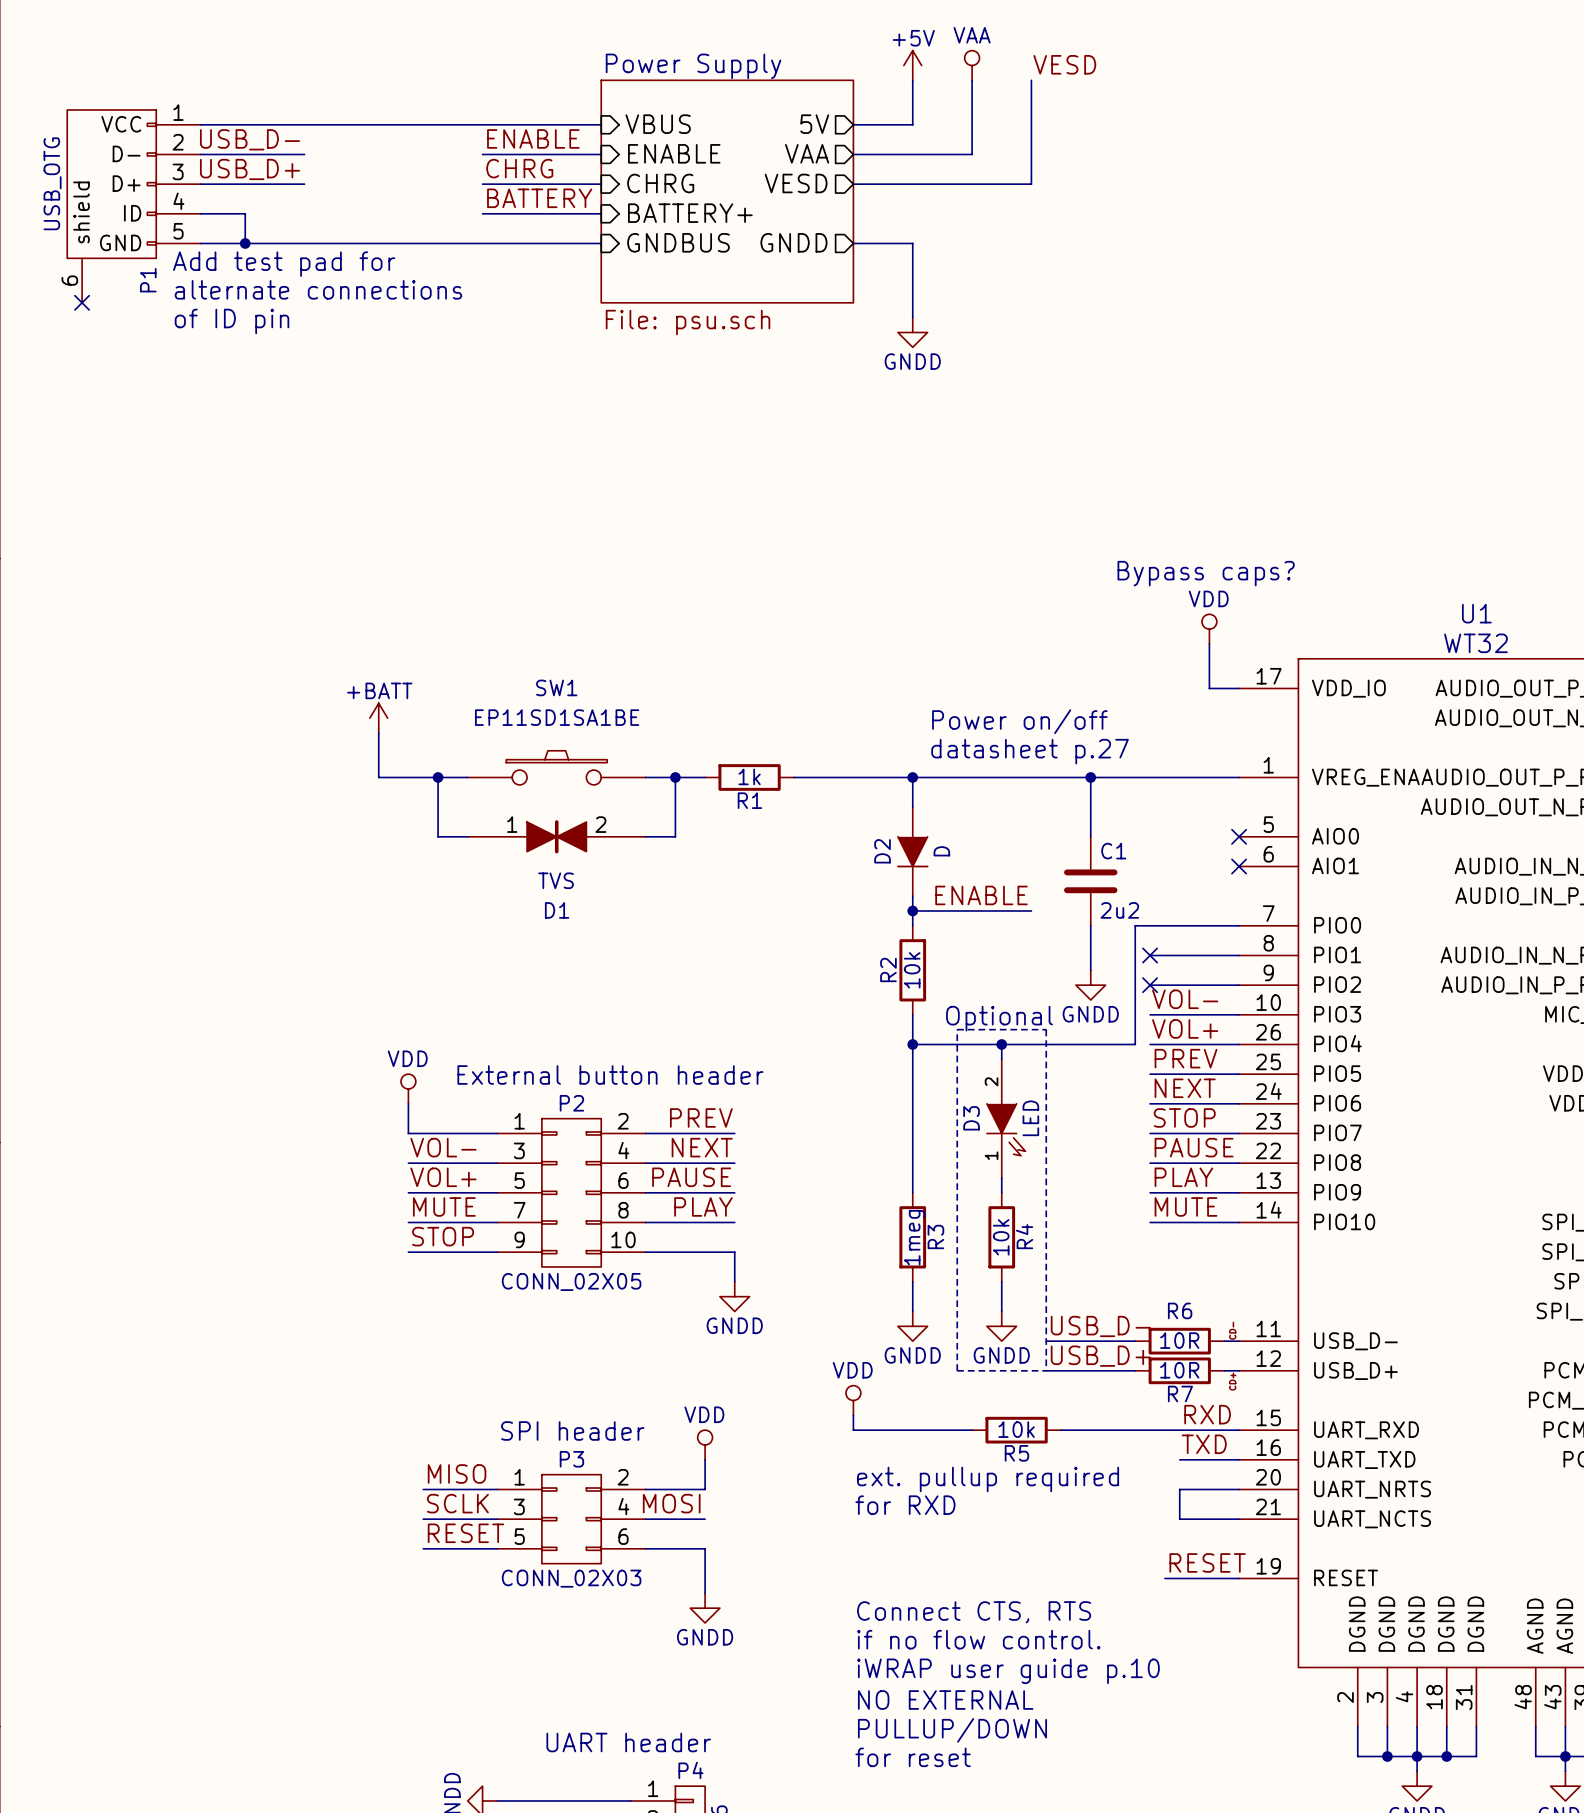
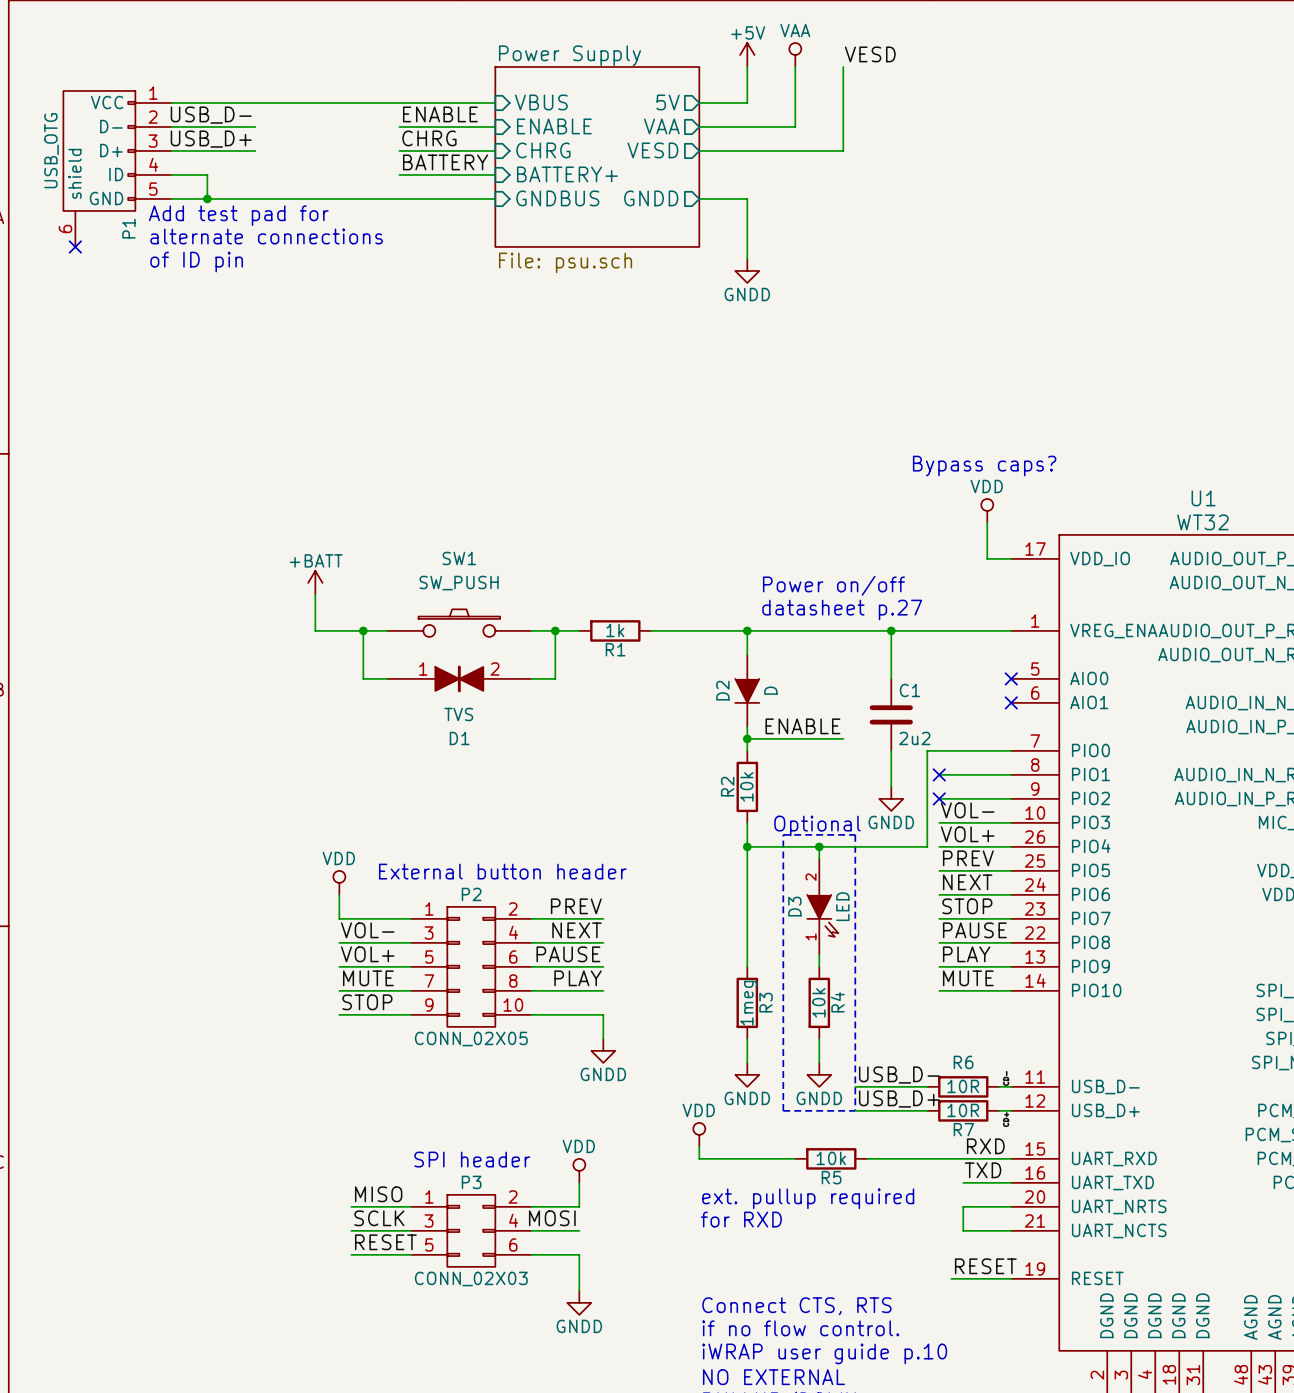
SW1 value: EP11SD1SA1BE (557, 717) -> SW_PUSH (459, 583)

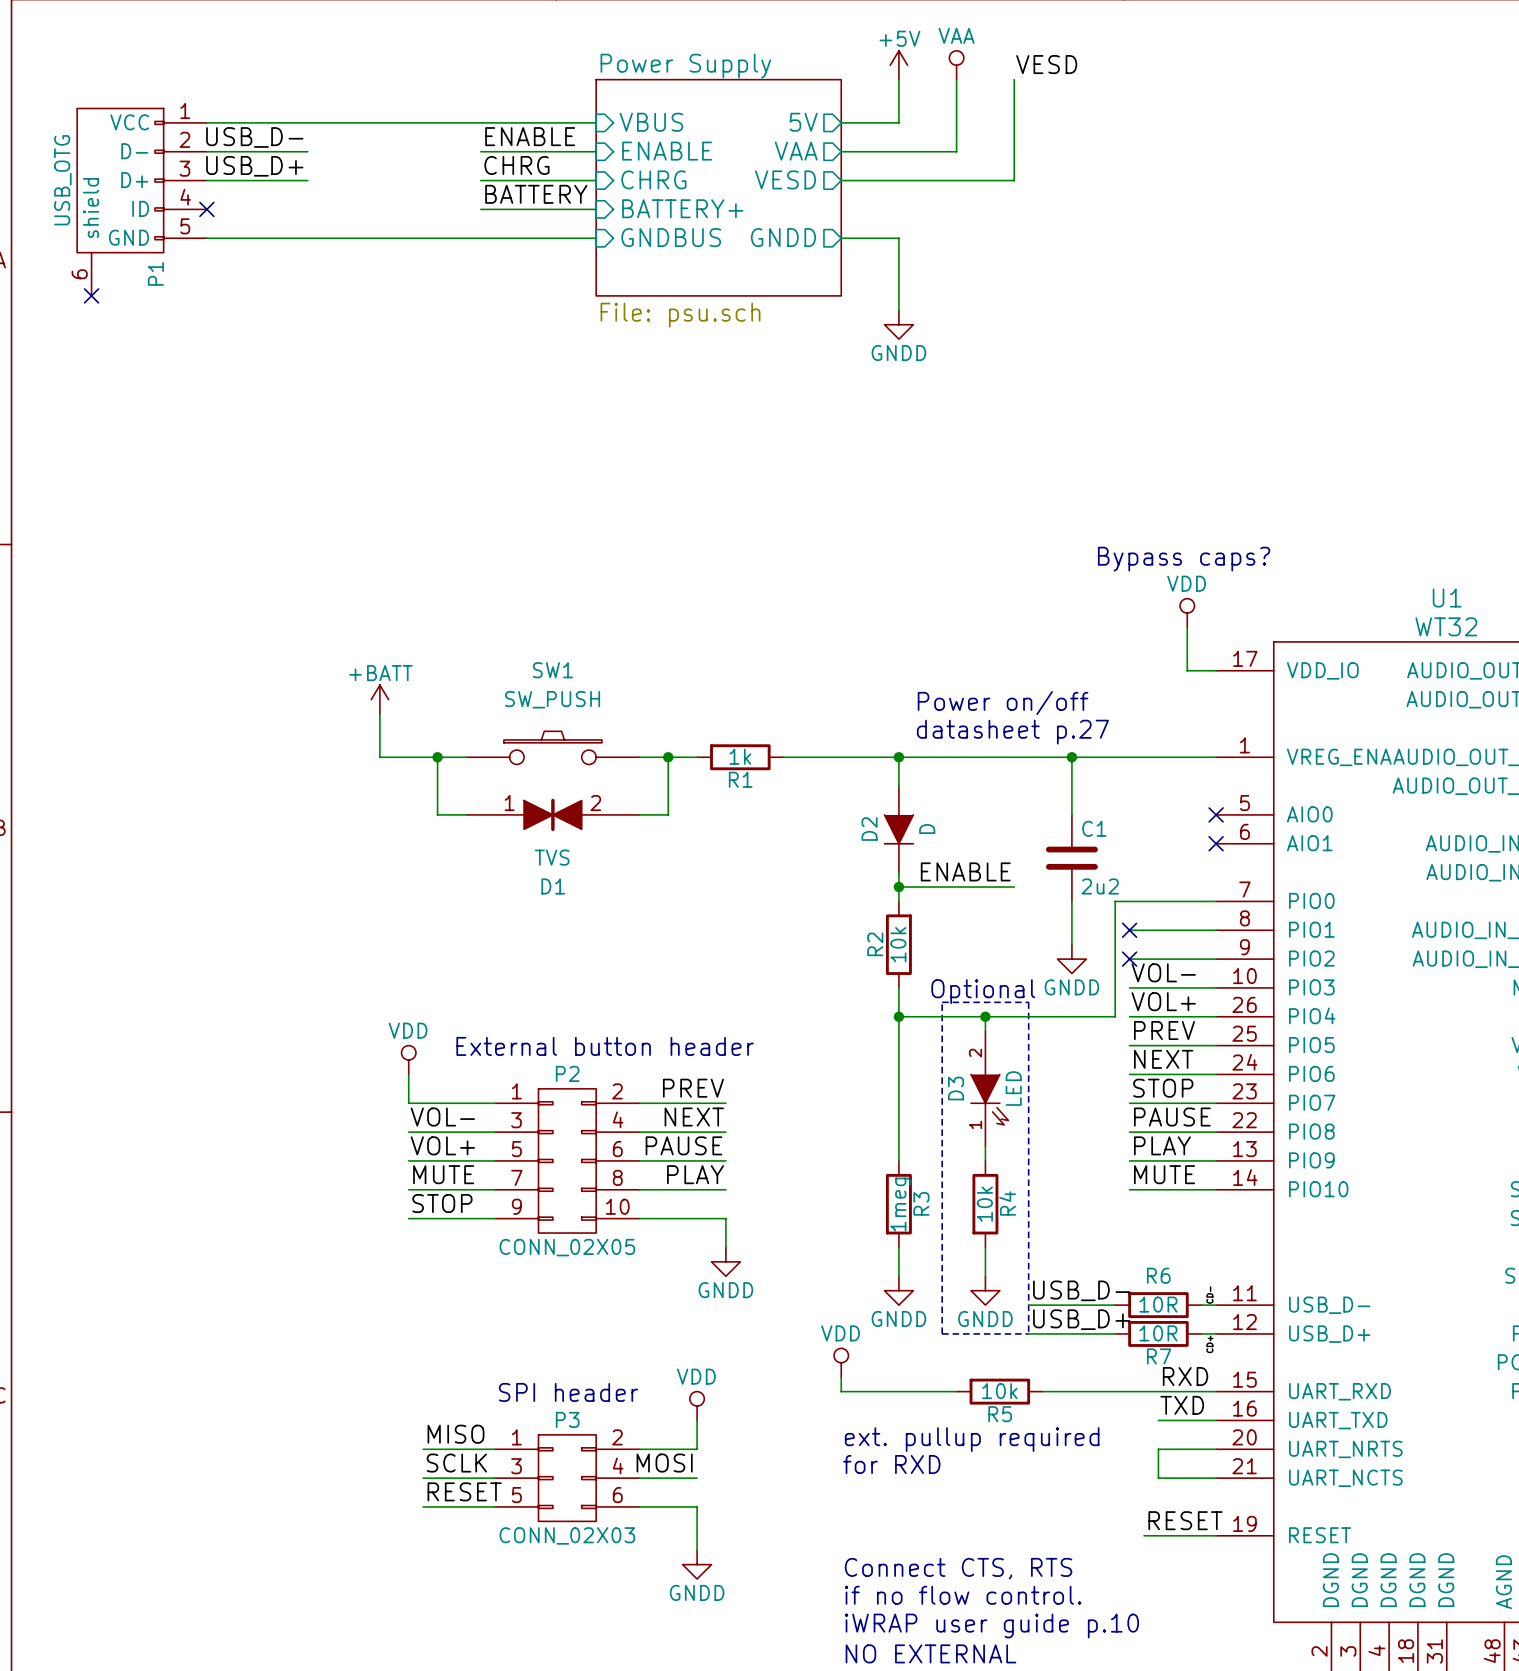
wire: (171, 174) (207, 174) (207, 198) -> none
no-connect mark: none -> (206, 209)
junction: (207, 198) -> none
text: Add test pad for (238, 215) -> none
text: alternate connections (266, 236) -> none
text: of ID pin (196, 262) -> none

